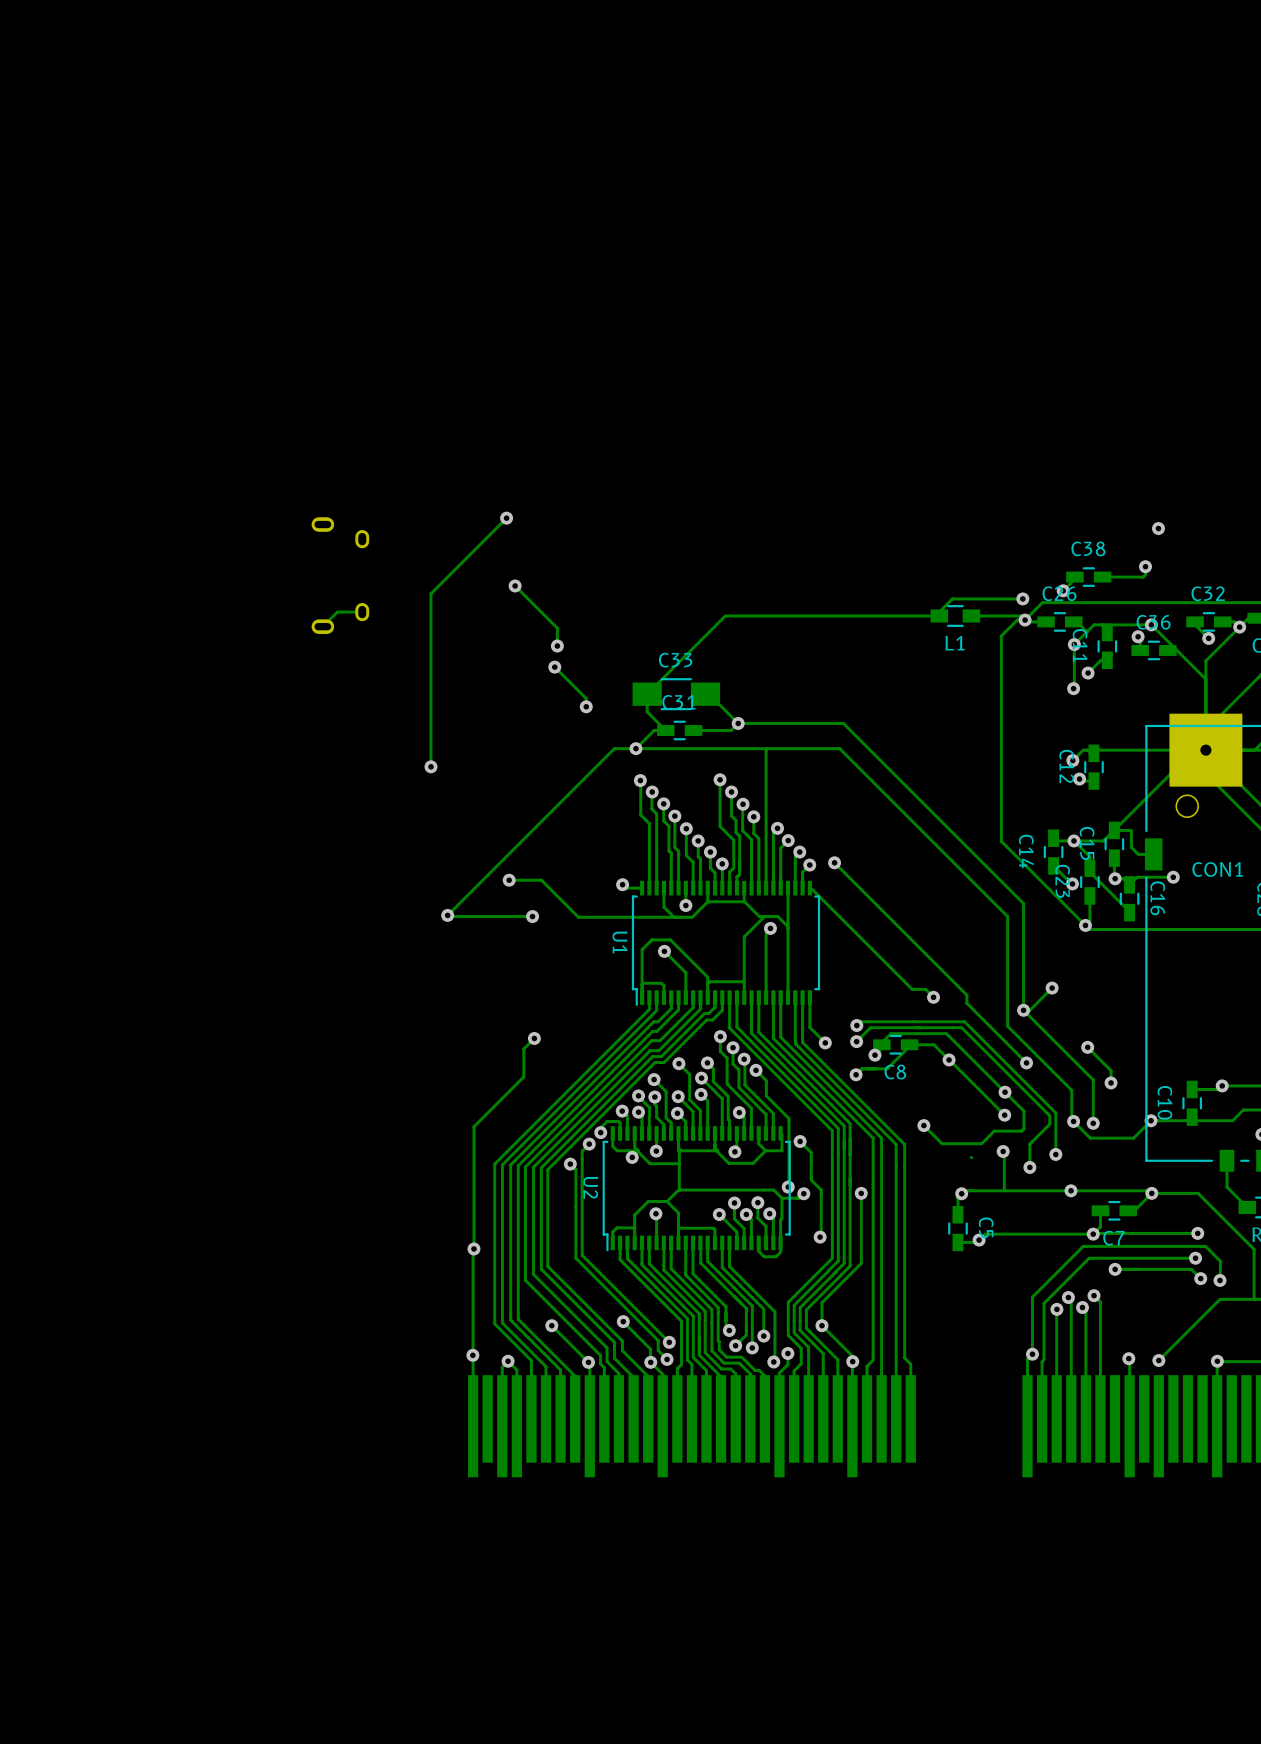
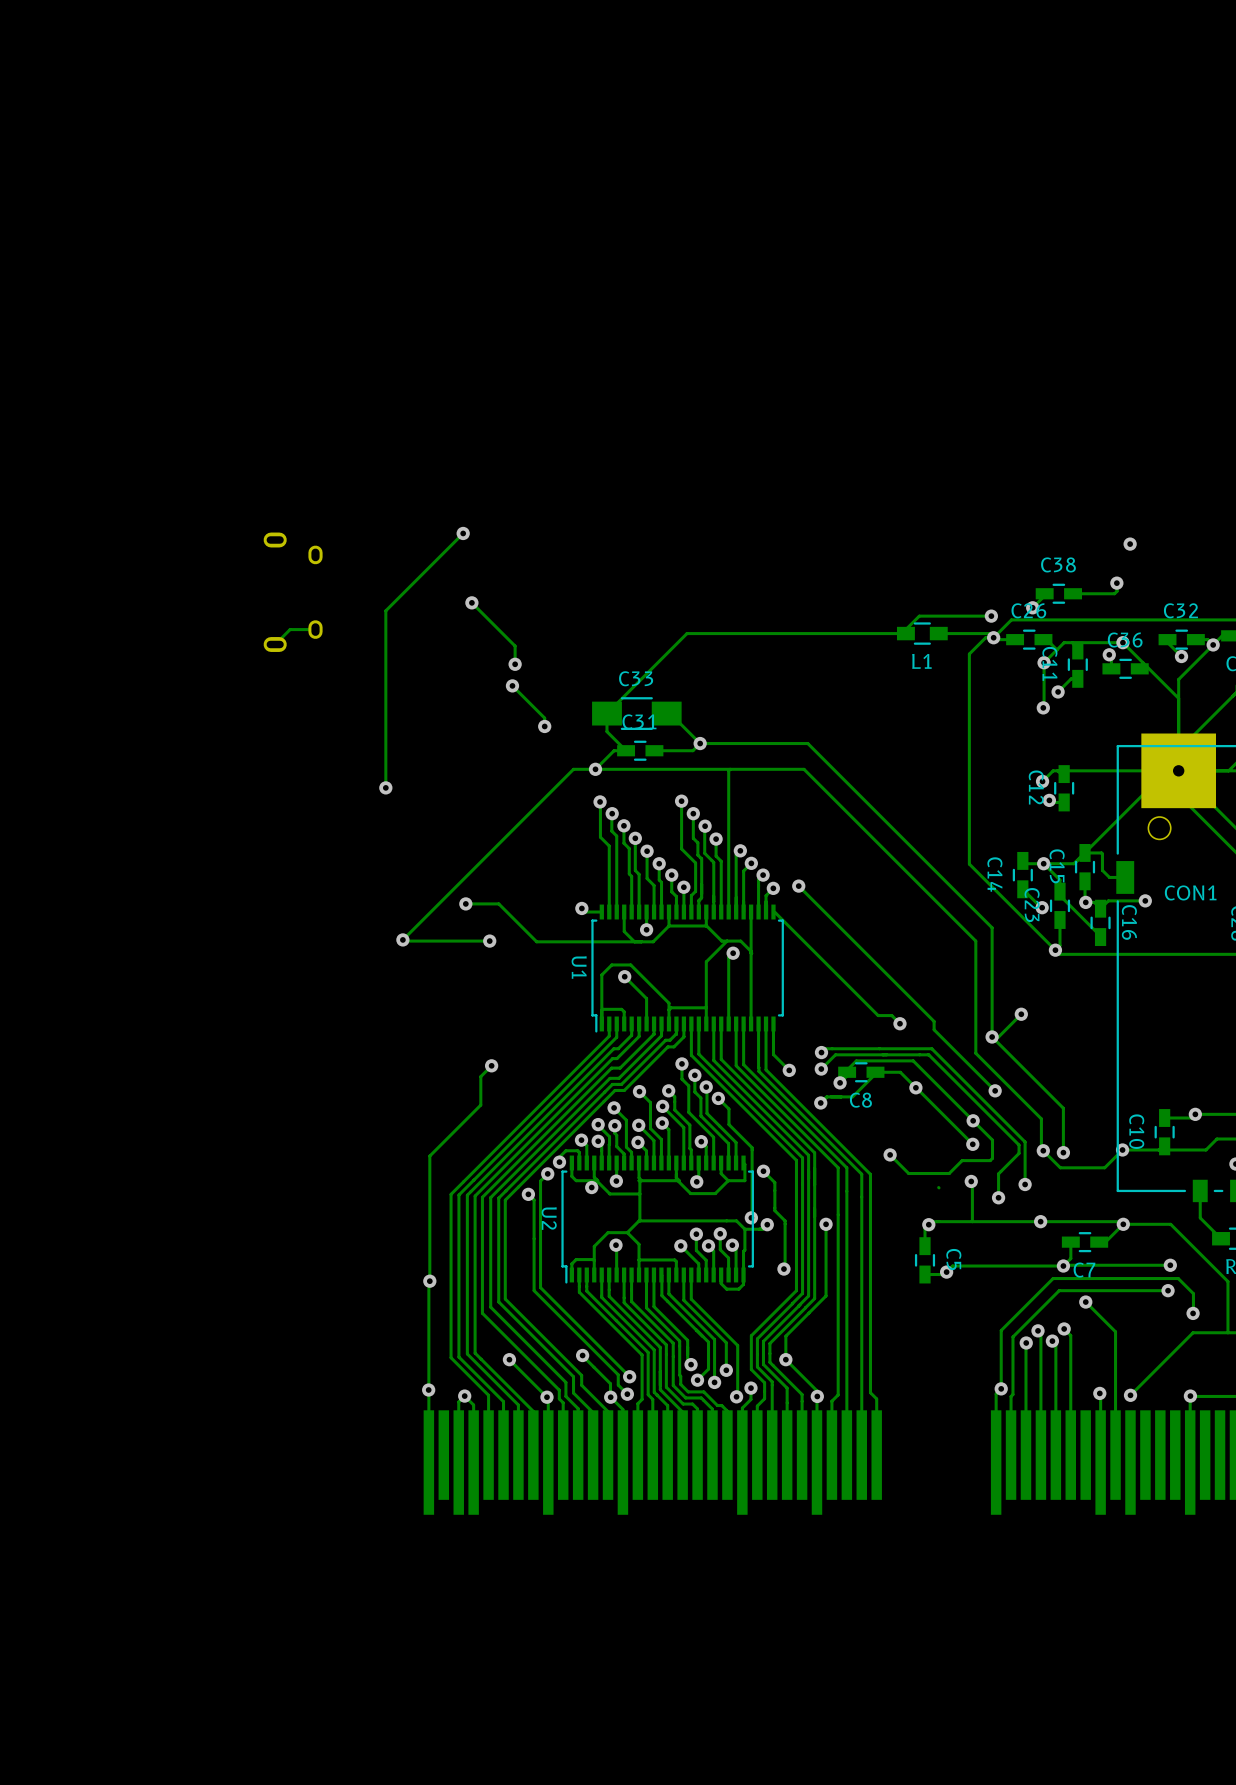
track: (1087, 1047) (1111, 1070) (1111, 1082) -> none
via: (1087, 1047) -> none
via: (1111, 1082) -> none
track: (1115, 1269) (1191, 1269) (1200, 1278) -> (1085, 1302) (1115, 1331) (1115, 1455)
via: (1200, 1278) -> none

